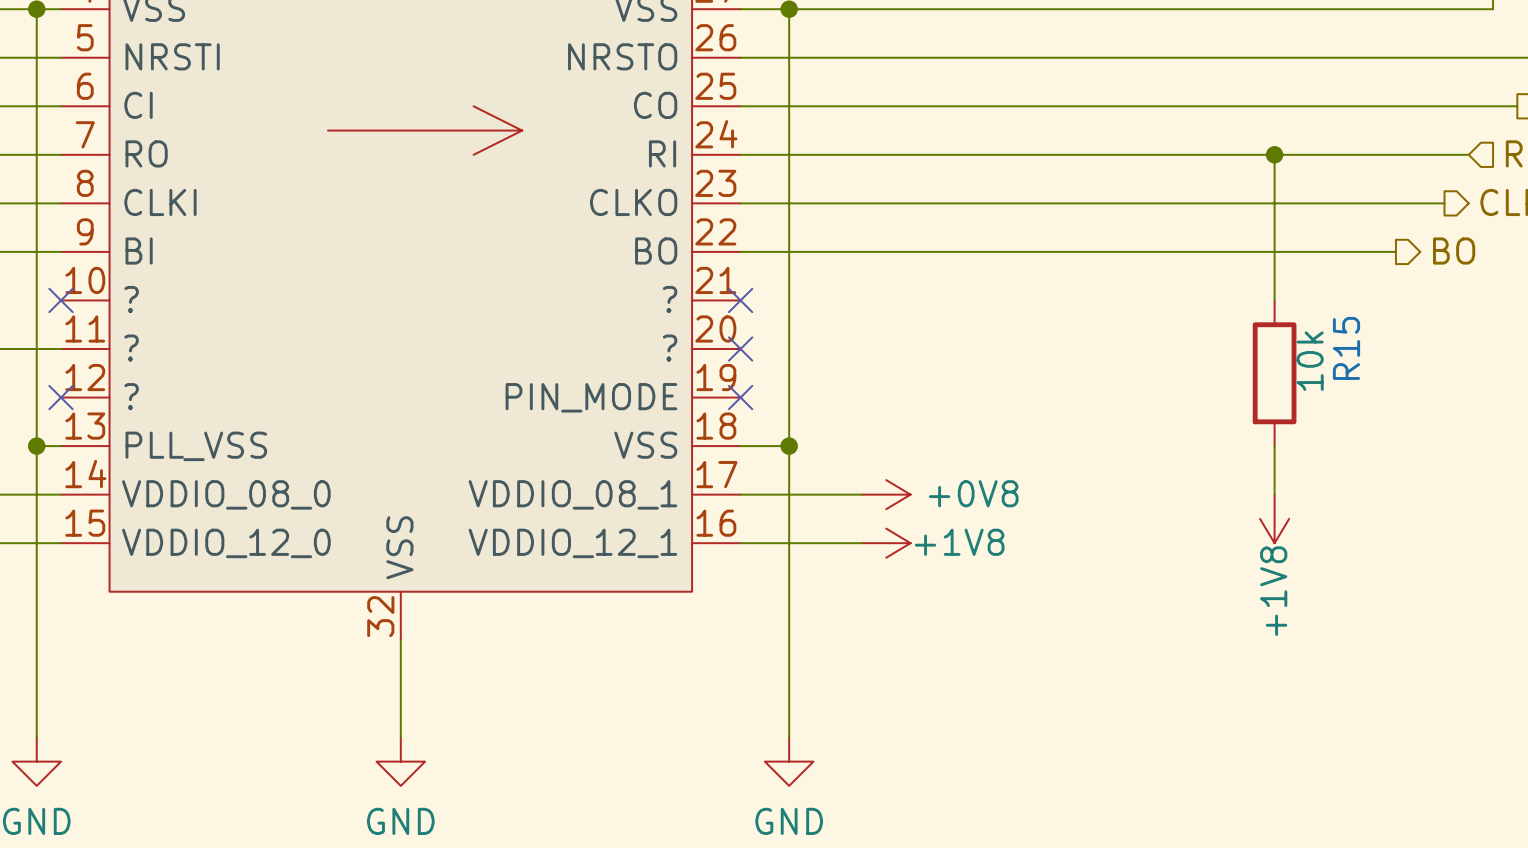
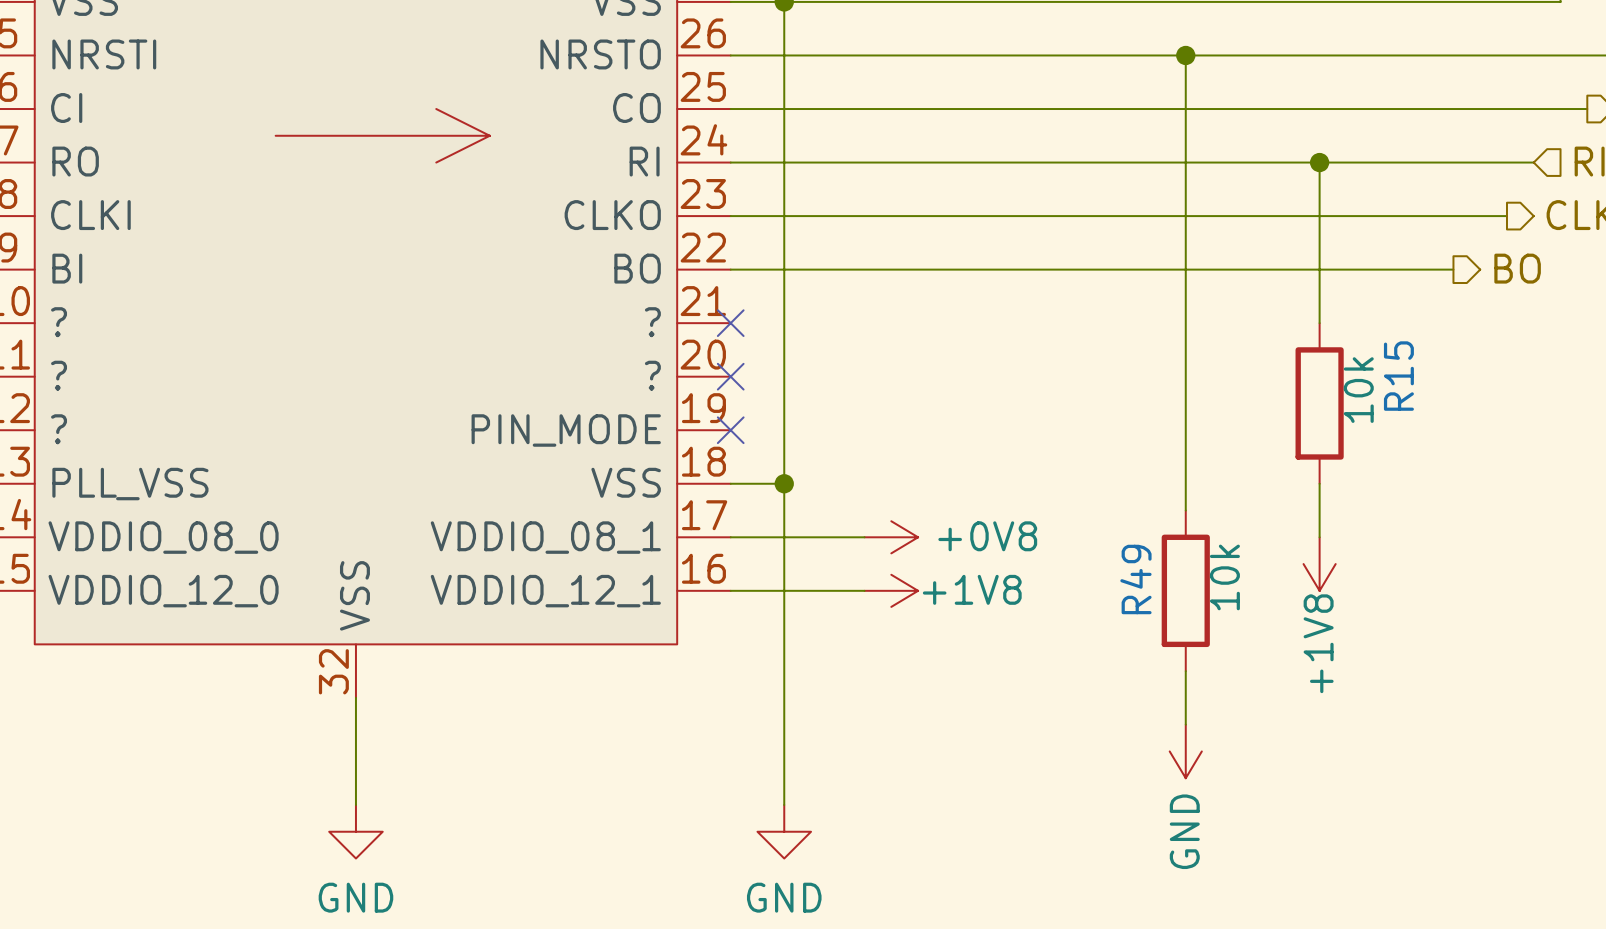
wire: none -> (1185, 55) (1185, 510)
junction: none -> (1185, 55)
R49: none -> 10k (1185, 590)
wire: none -> (1185, 671) (1185, 724)
power symbol: none -> GND (1185, 751)

